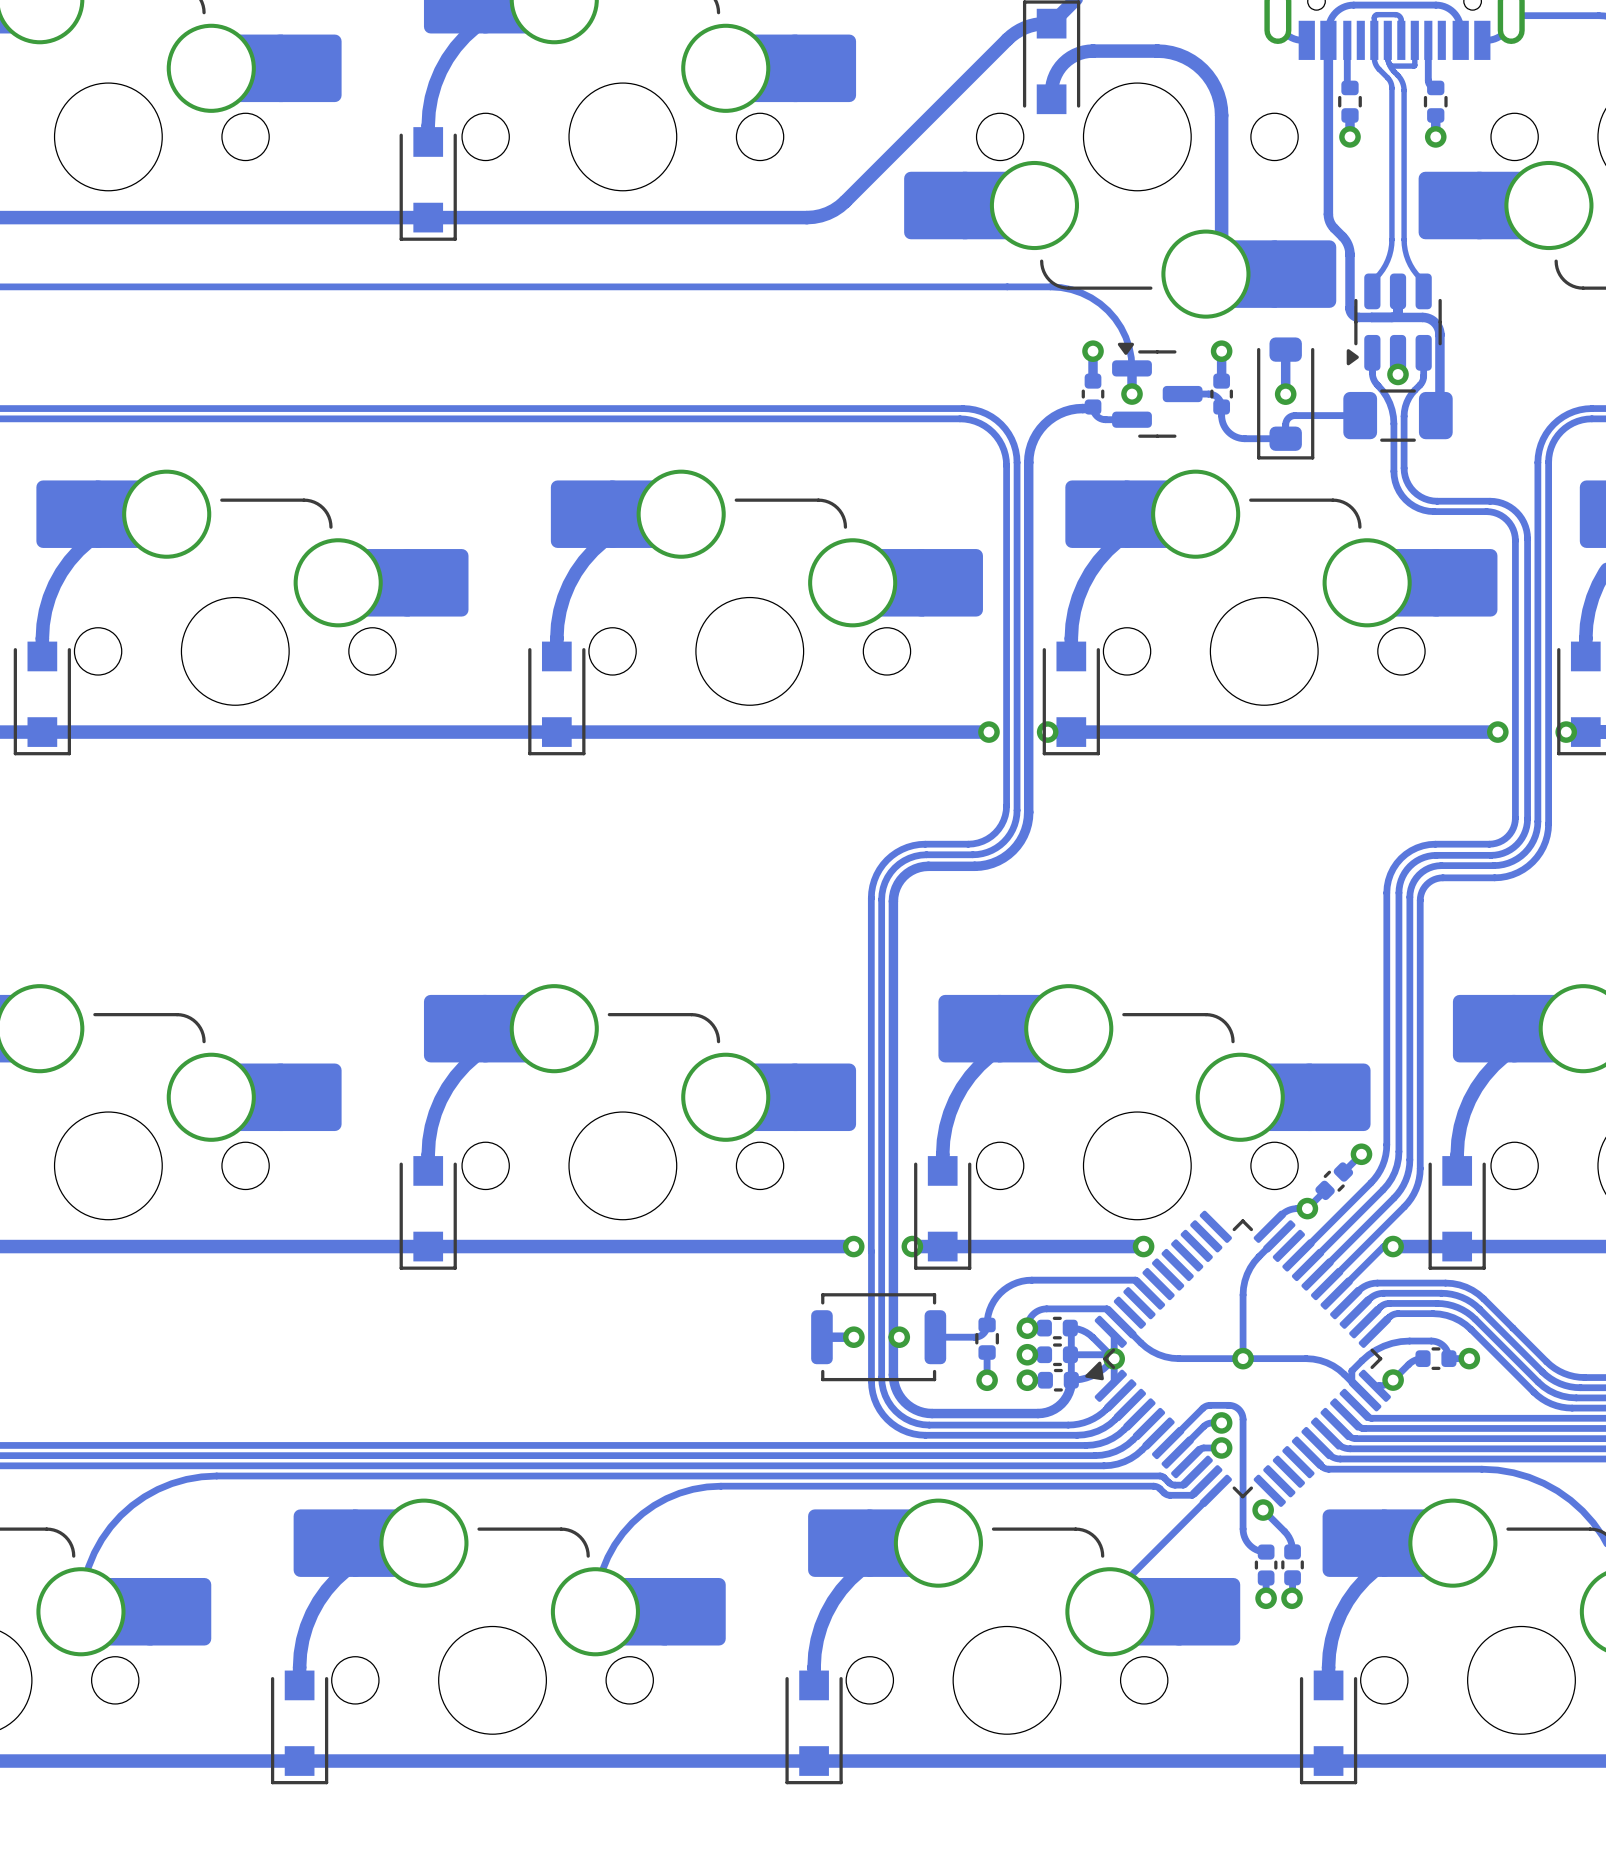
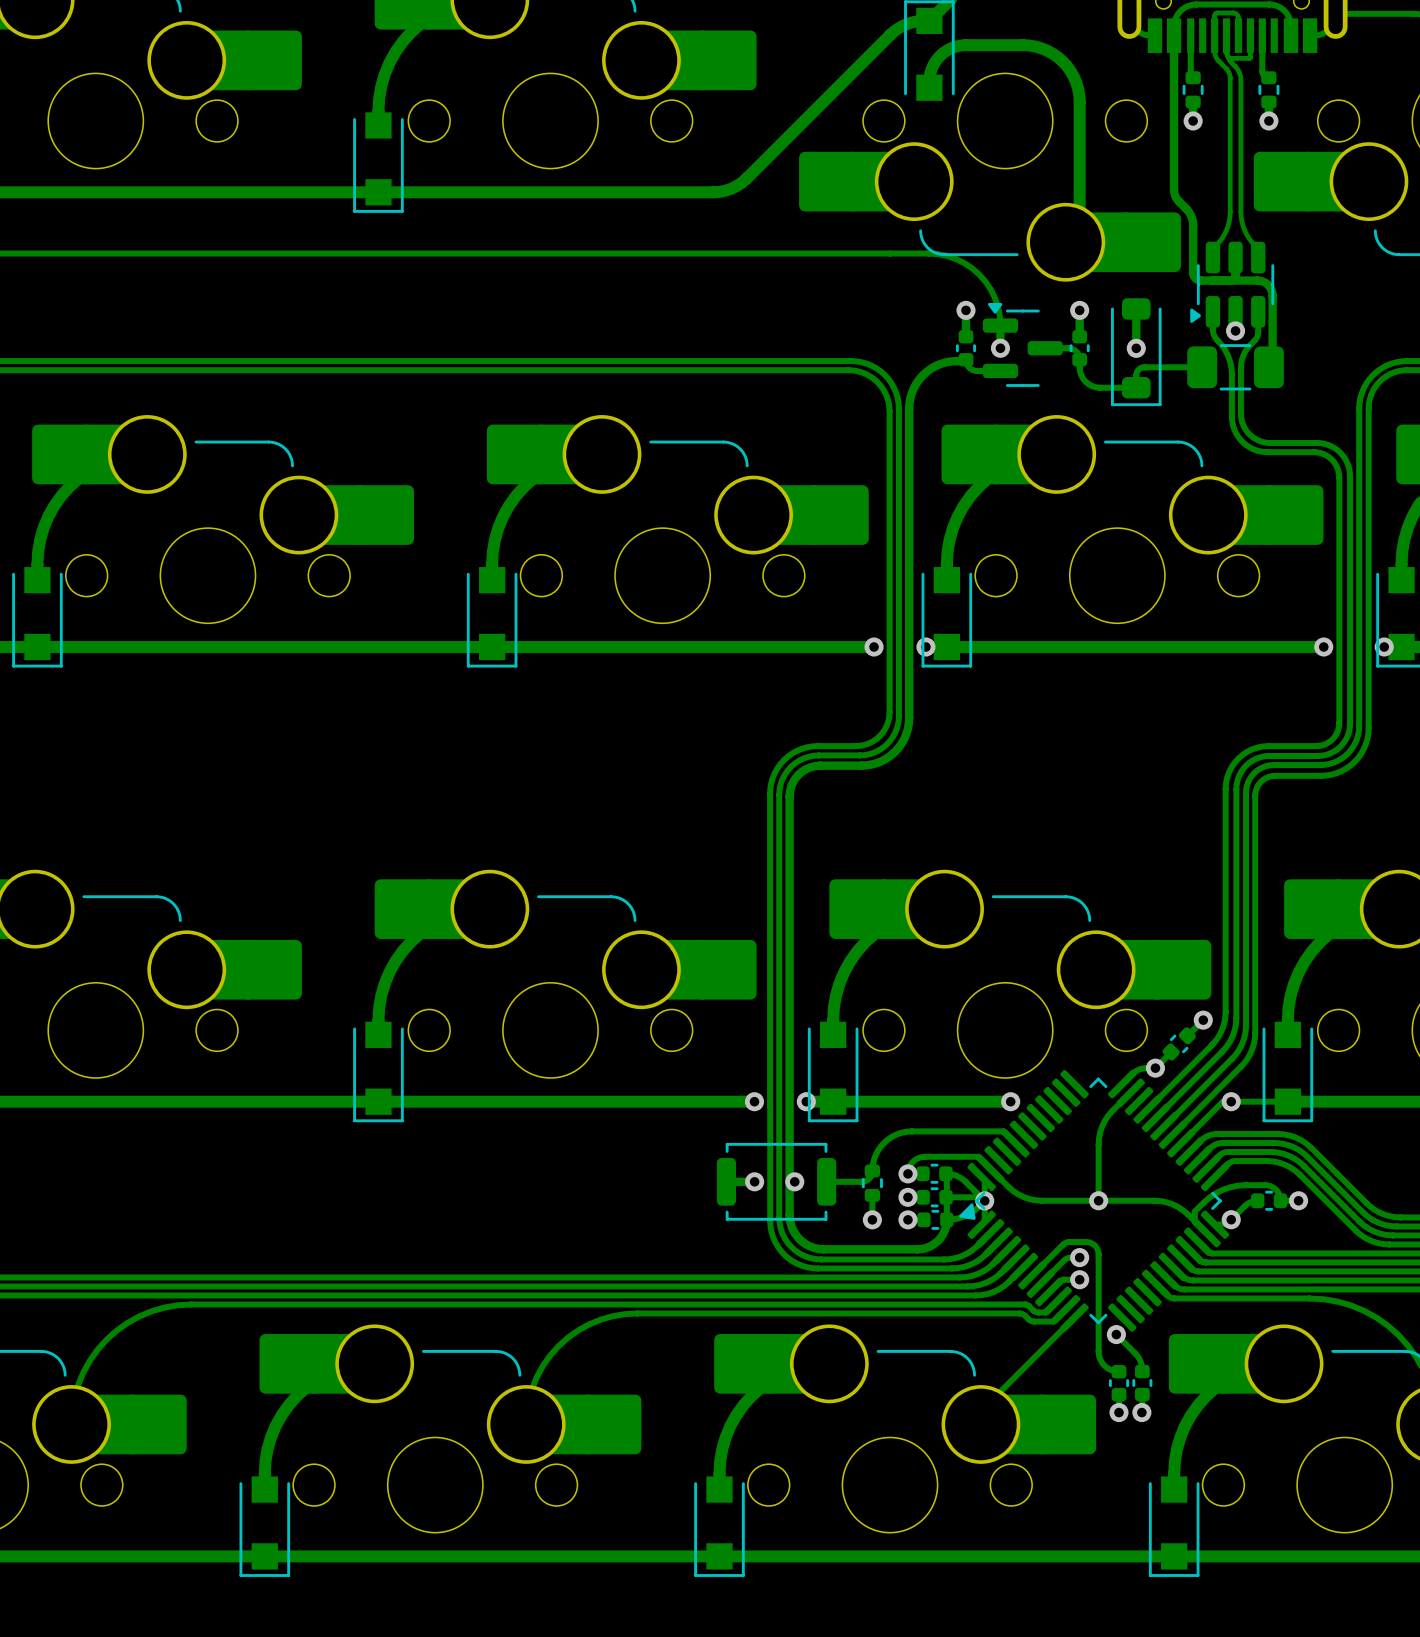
track width: thick (1457, 1246) (1393, 1246) -> thin (1287, 1101) (1231, 1101)

